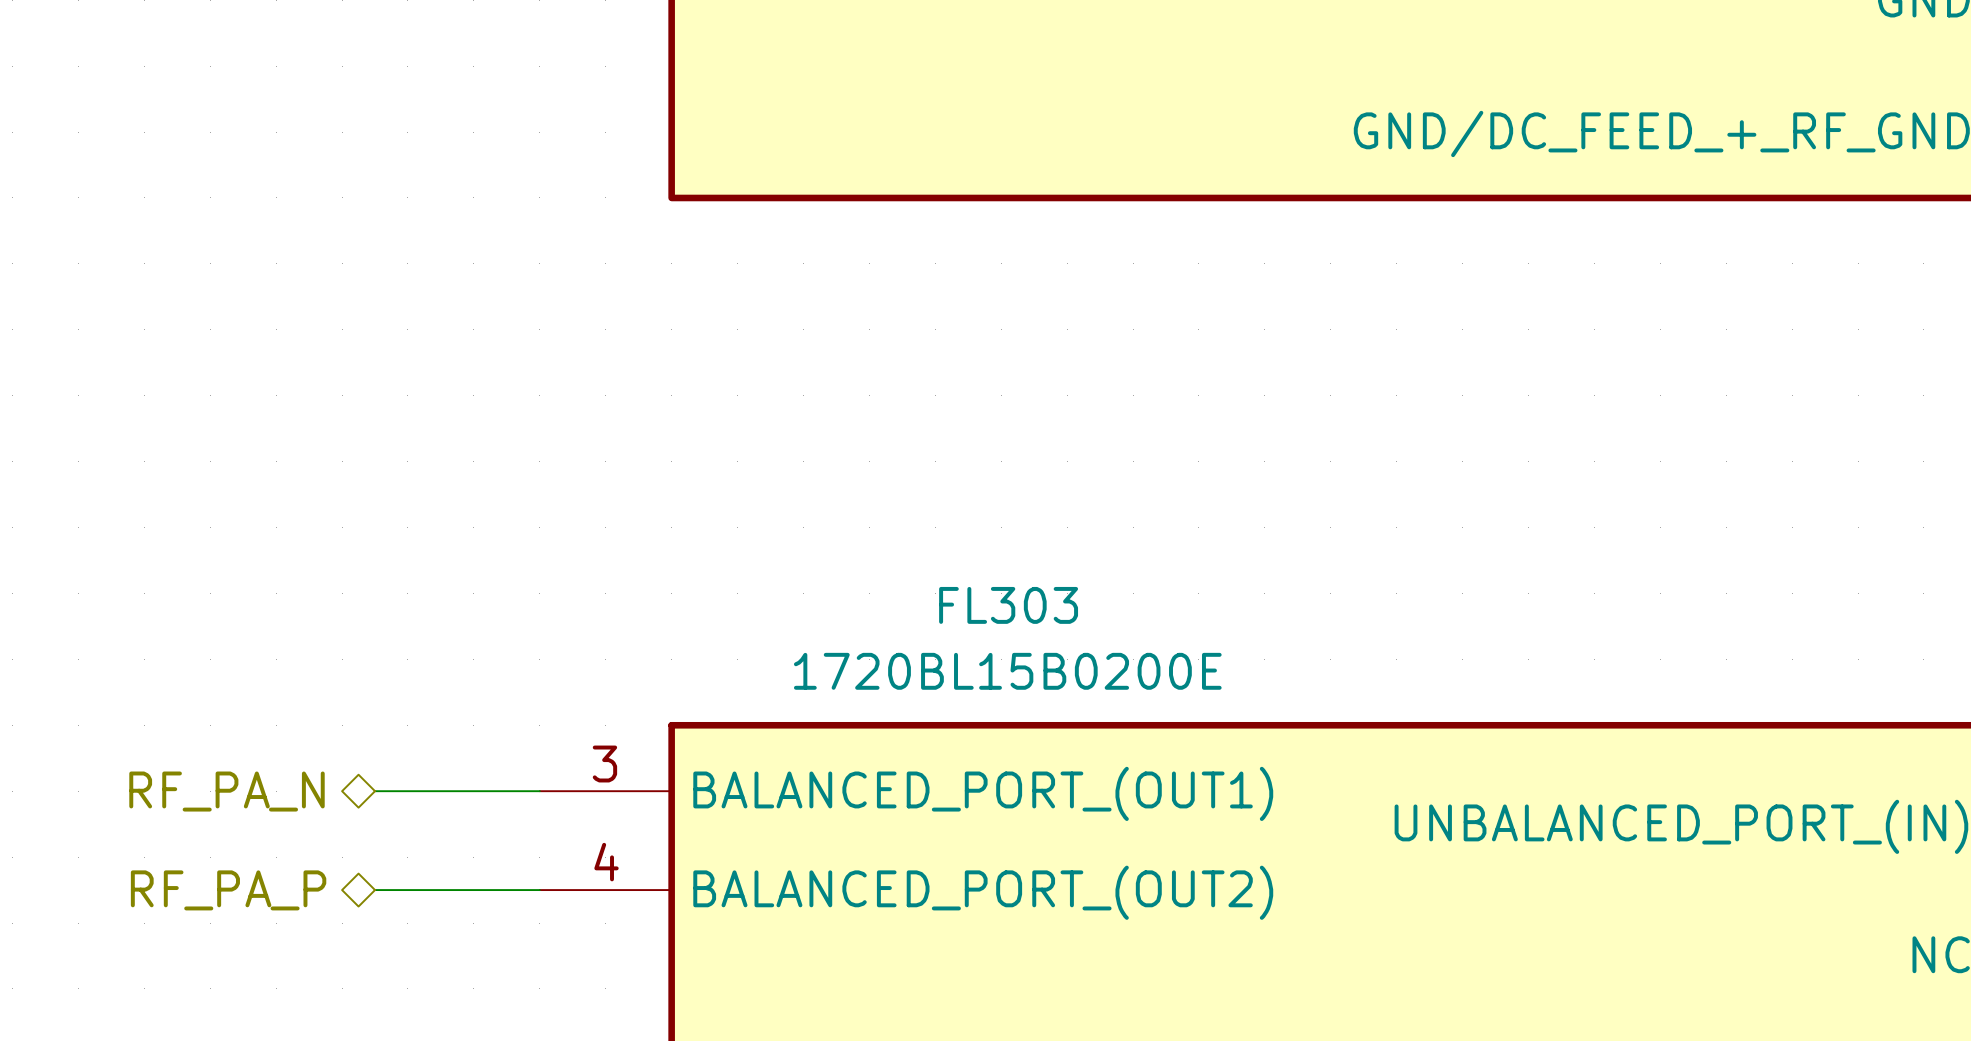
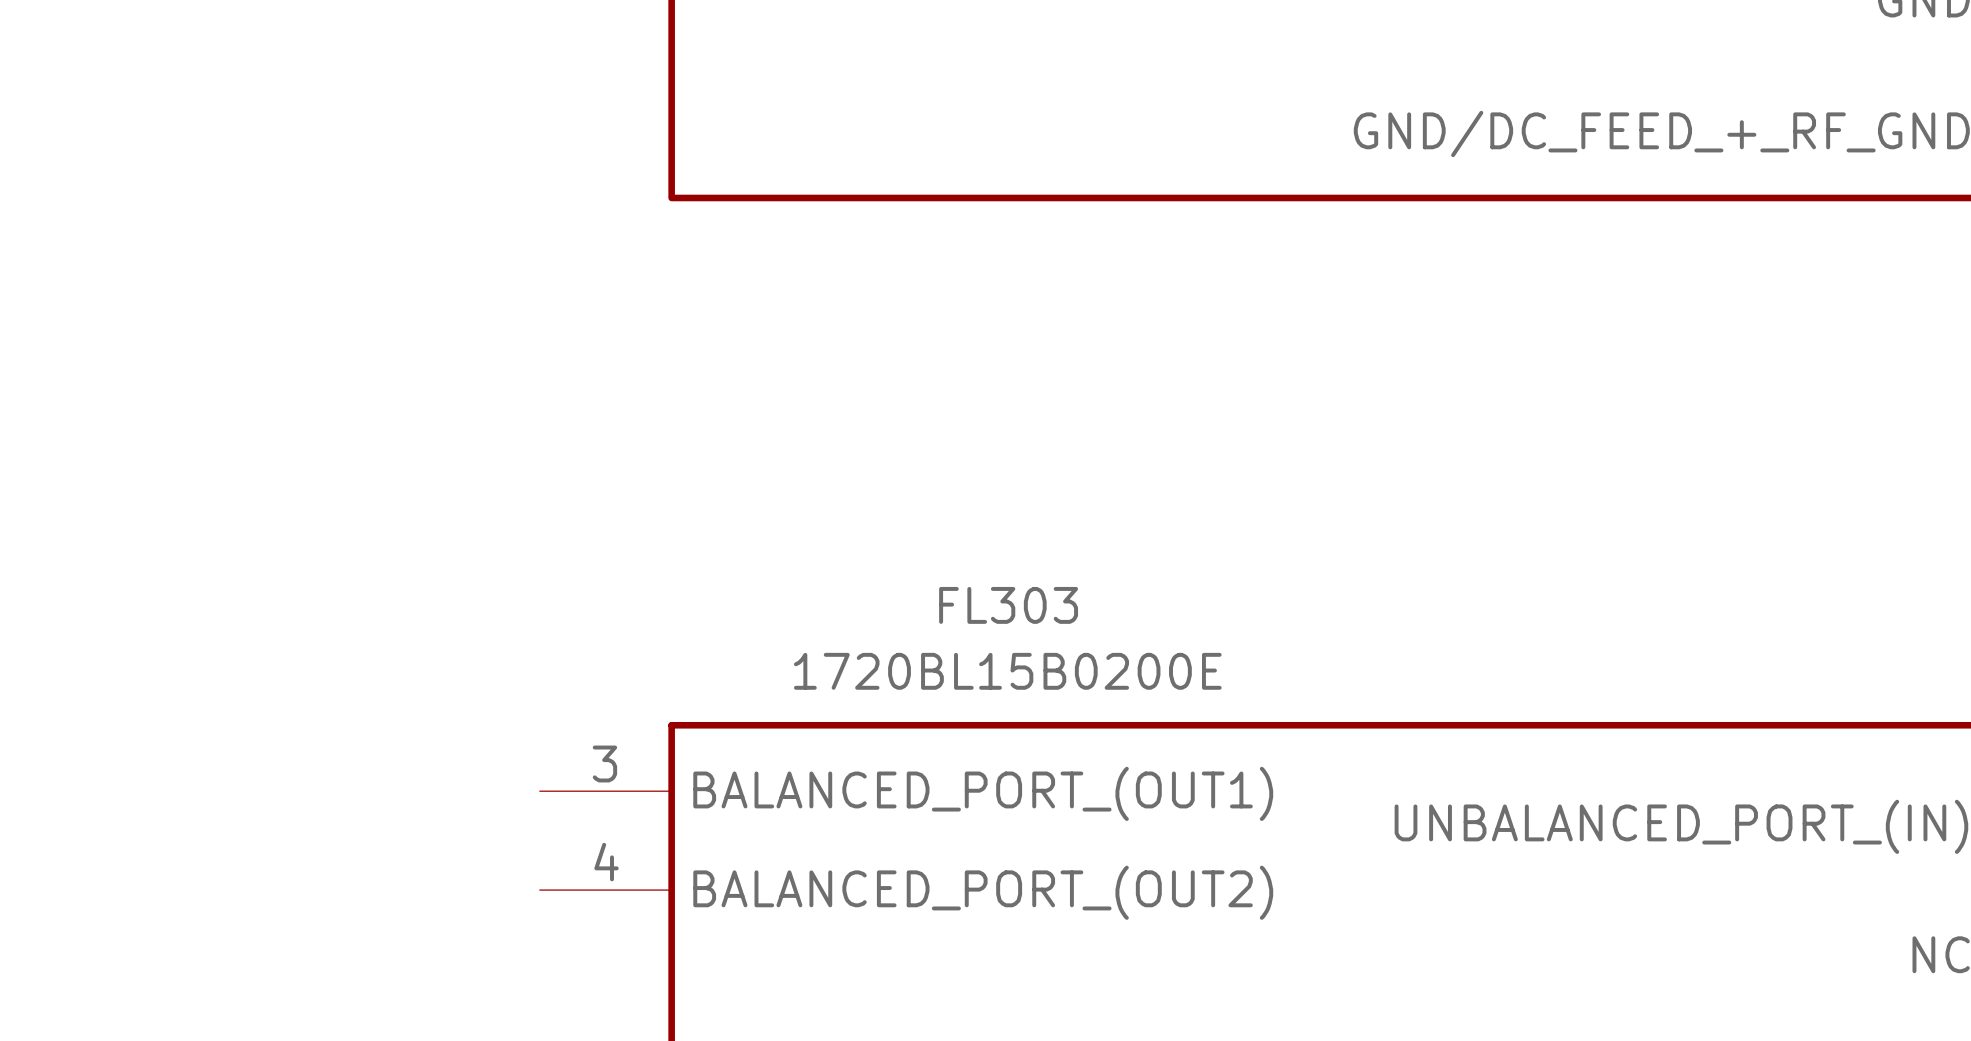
hierarchical label: RF_PA_N (227, 791) -> none
wire: (375, 791) (539, 791) -> none
hierarchical label: RF_PA_P (228, 890) -> none
wire: (375, 890) (539, 890) -> none

